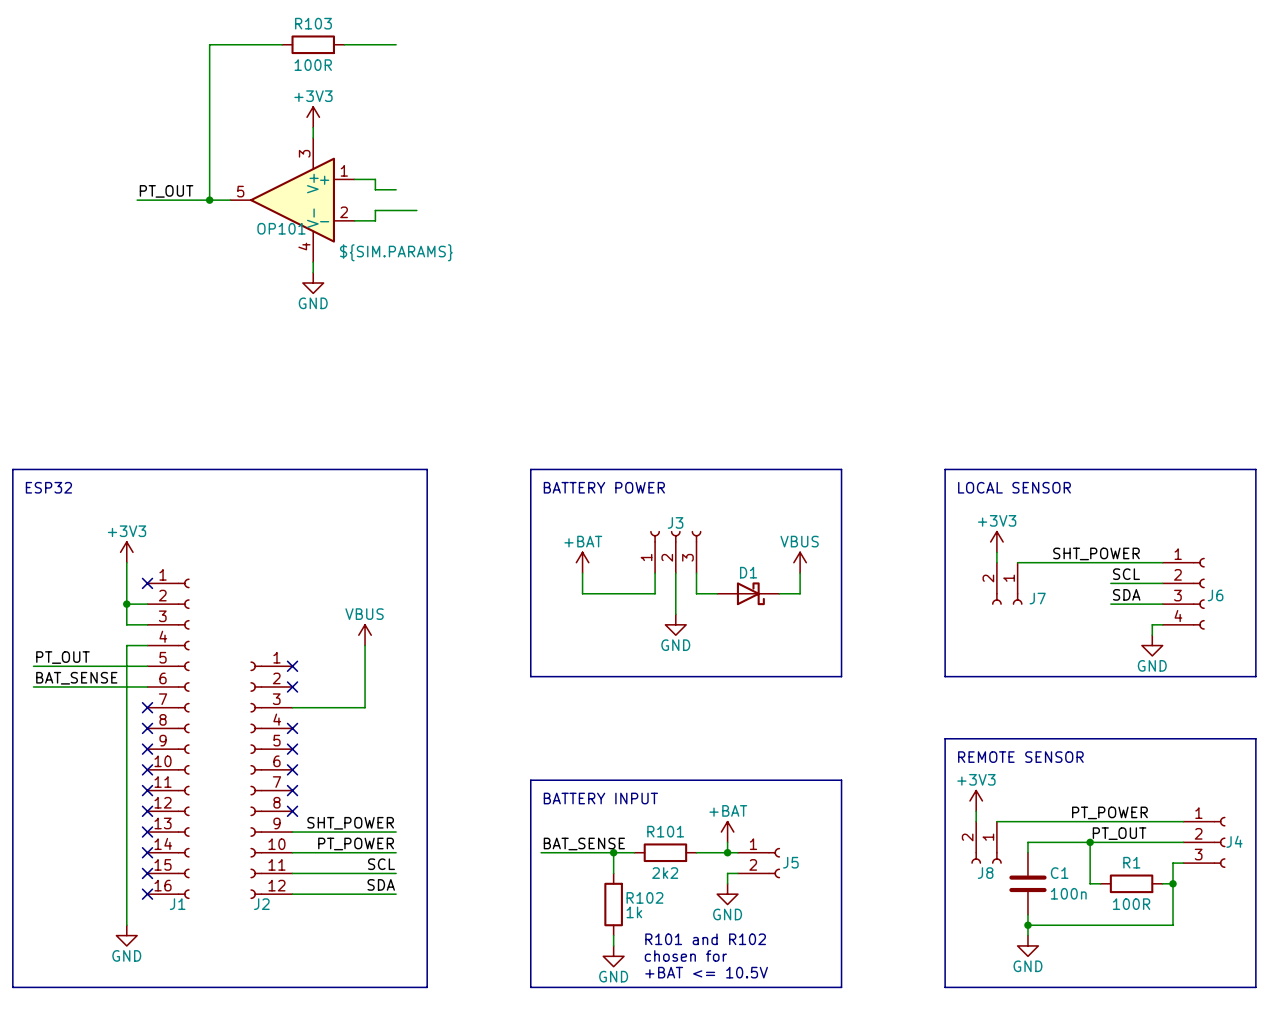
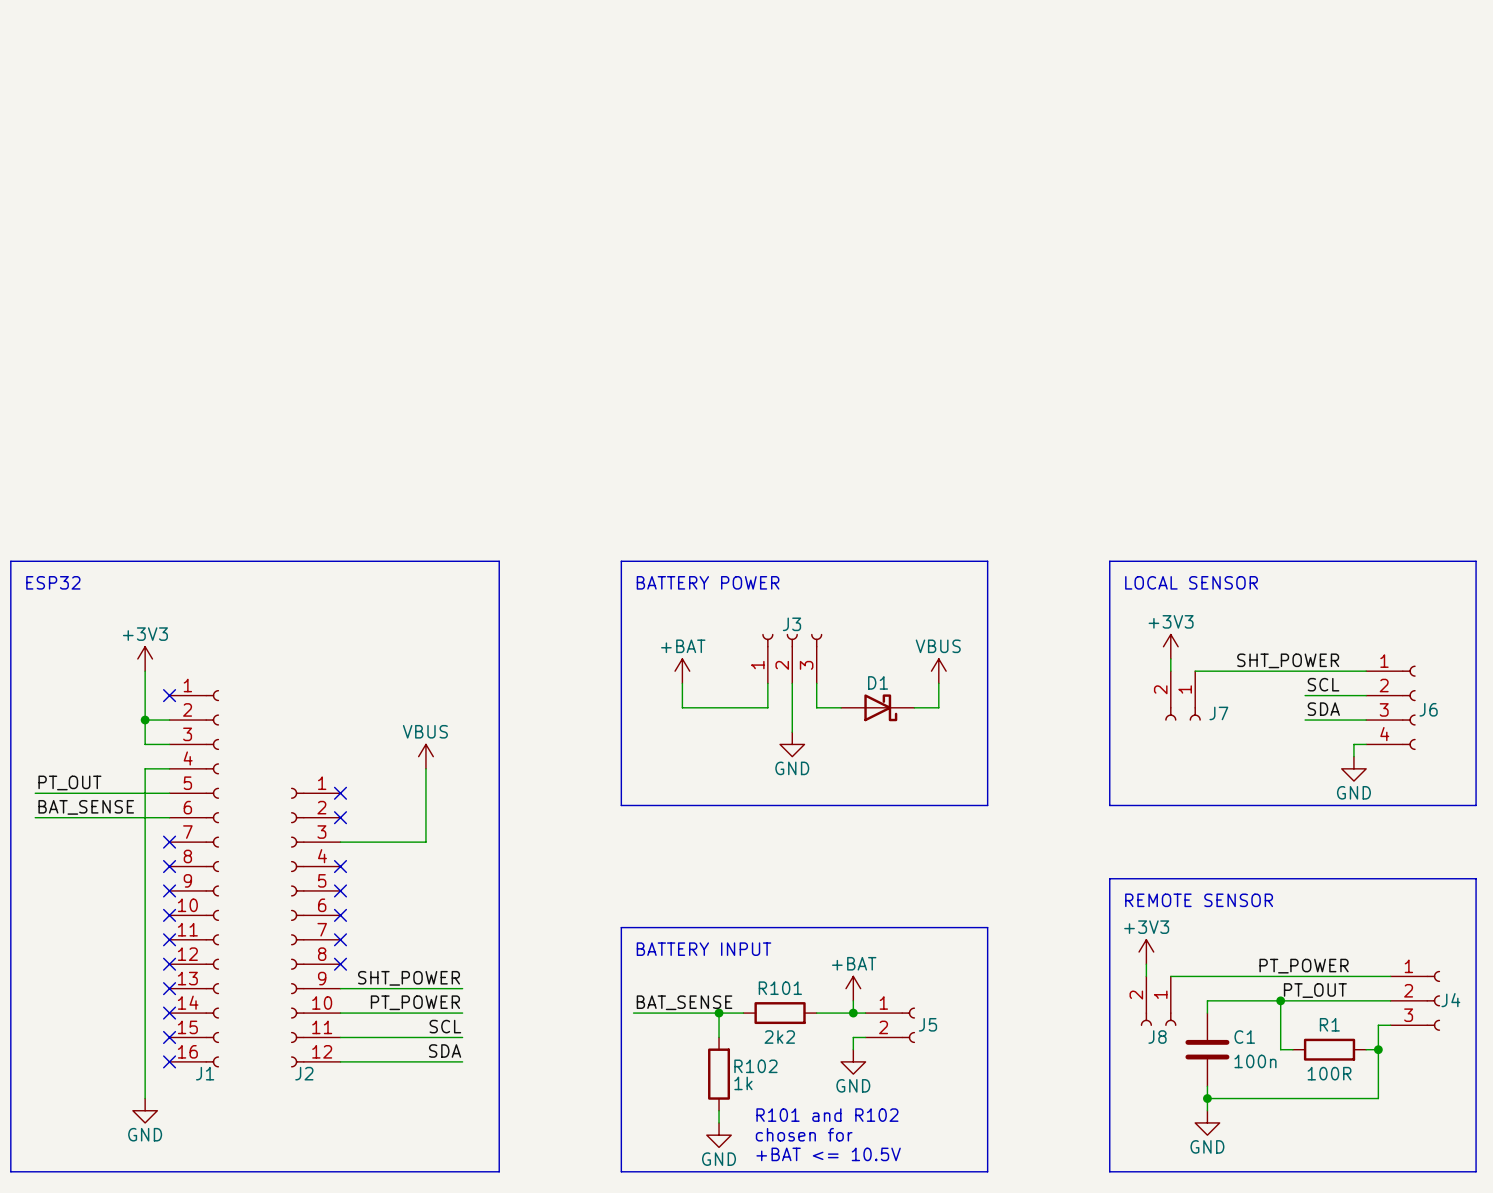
wire: (282, 44) (209, 44) (209, 200) -> none
R103: 100R (313, 44) -> none
wire: (344, 44) (396, 44) -> none
power symbol: +3V3 (313, 117) -> none
wire: (313, 127) (313, 137) -> none
wire: (354, 179) (375, 179) (375, 189) (396, 189) -> none
label: PT_OUT (166, 191) -> none
wire: (137, 200) (230, 200) -> none
junction: (209, 200) -> none
OP101: ${SIM.PARAMS} (292, 200) -> none
wire: (416, 210) (375, 210) (375, 220) (354, 220) -> none
wire: (313, 262) (313, 272) -> none
power symbol: GND (313, 283) -> none

